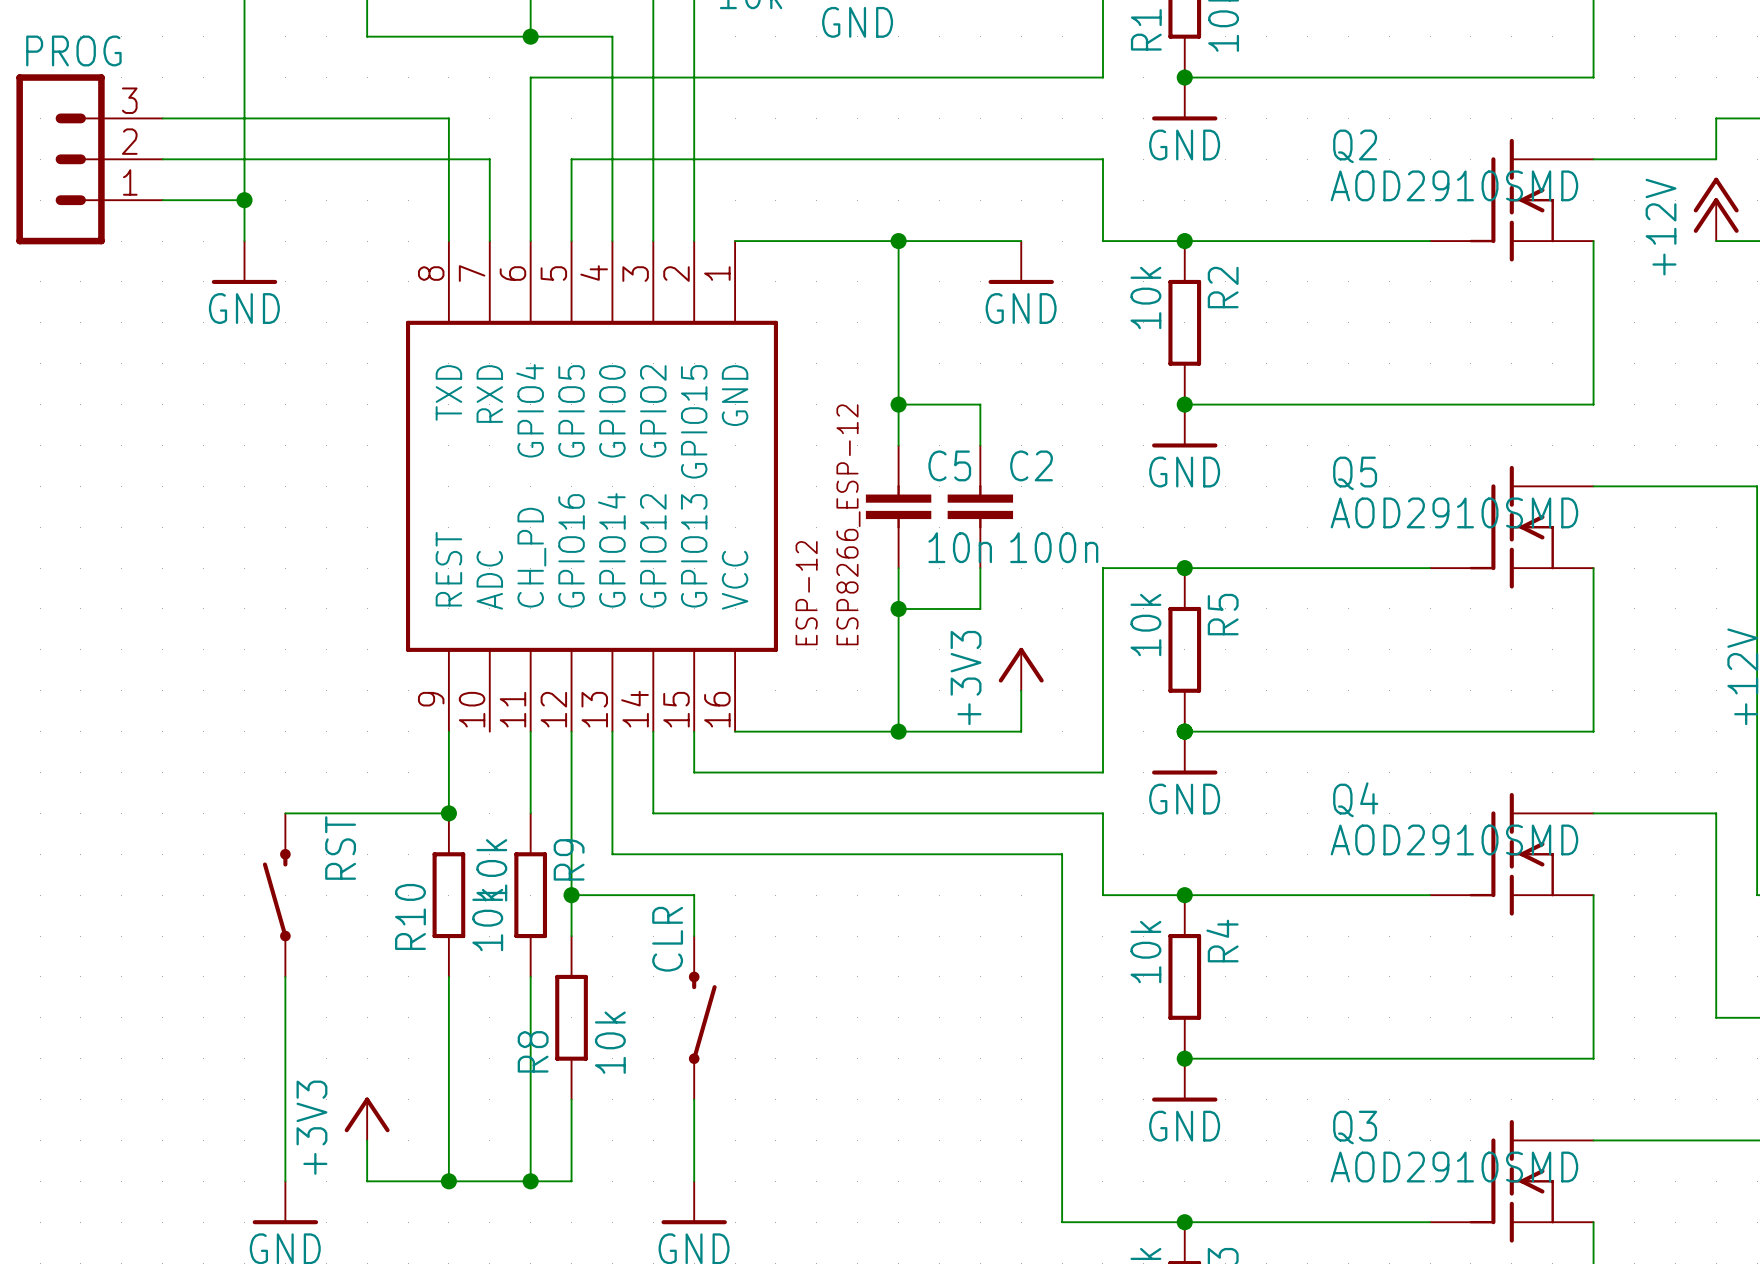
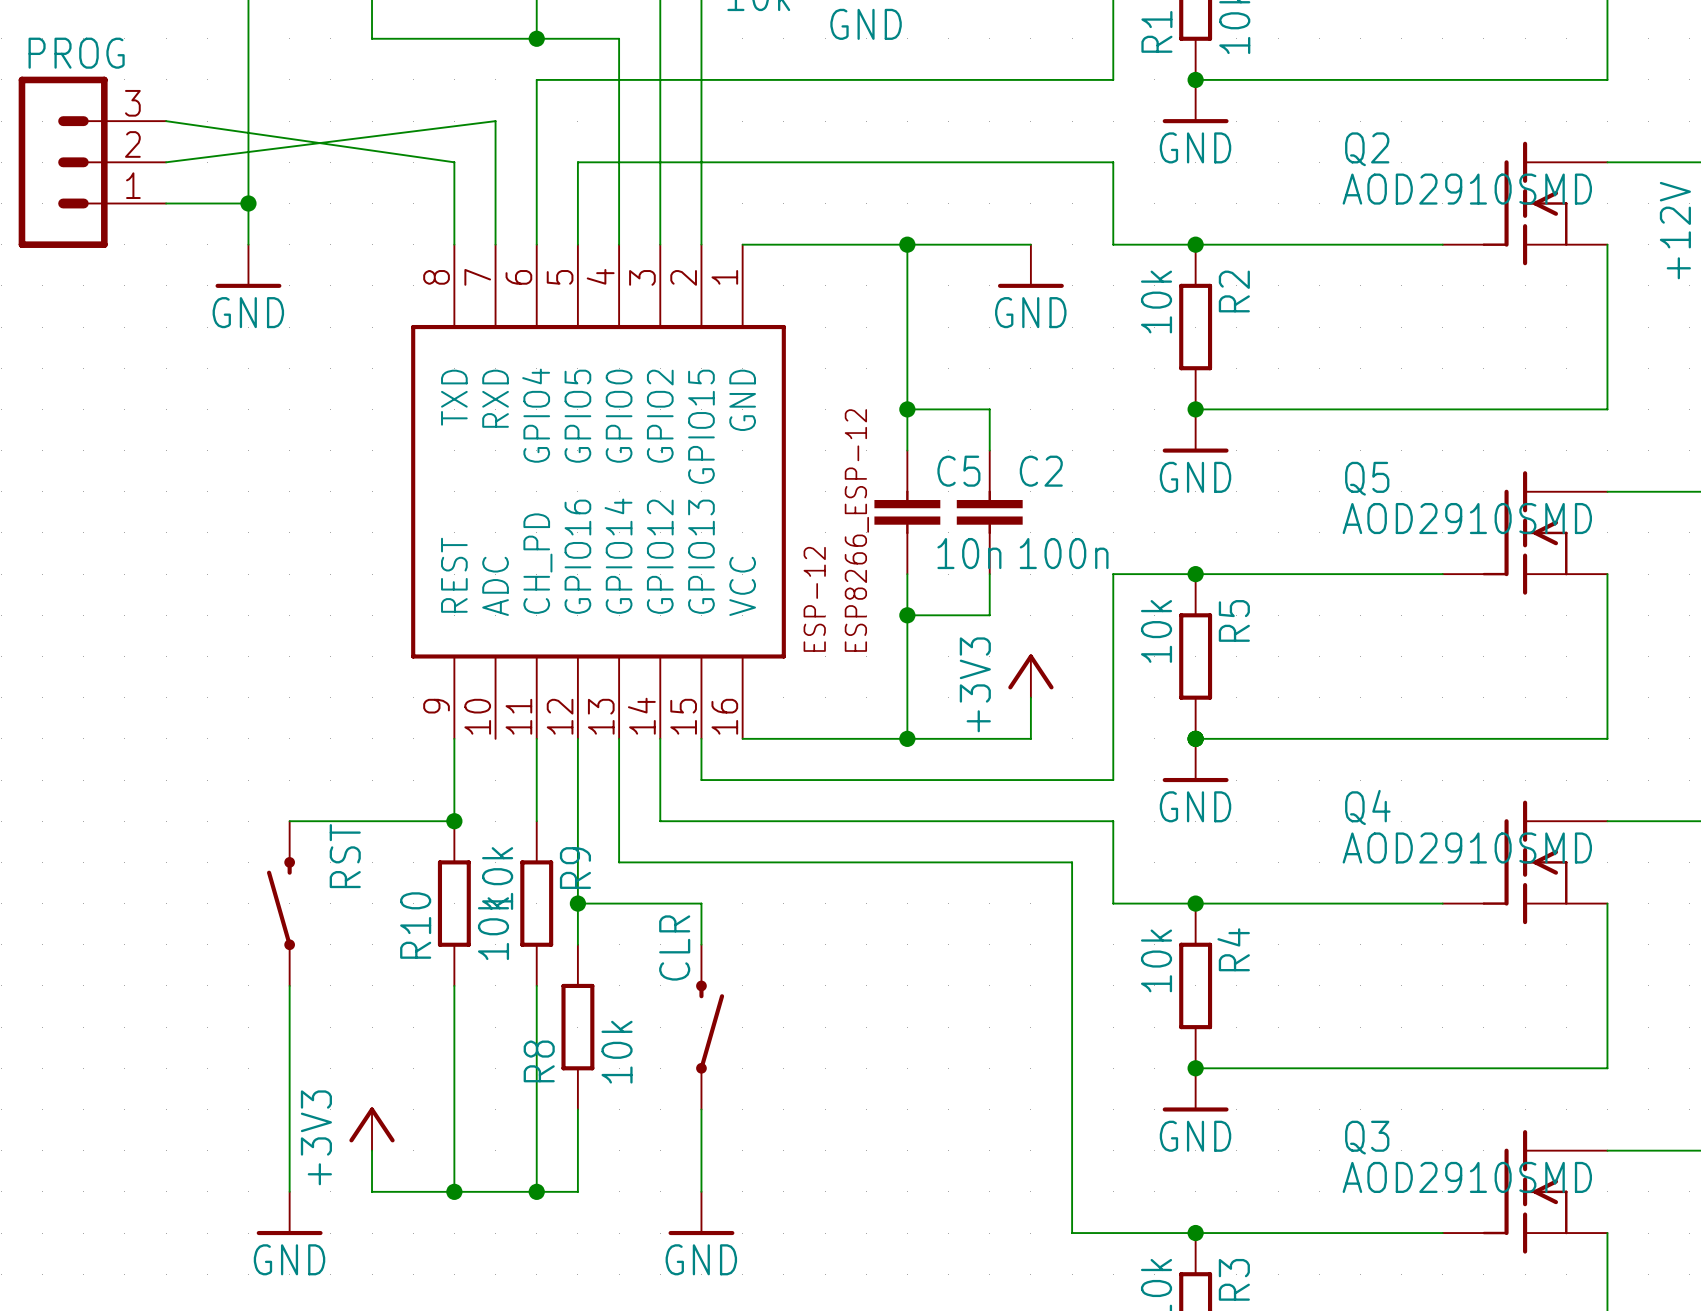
wire: (162, 118) (448, 118) (448, 159) -> (166, 121) (454, 162)
wire: (162, 159) (489, 159) -> (166, 162) (495, 121) (495, 162)

